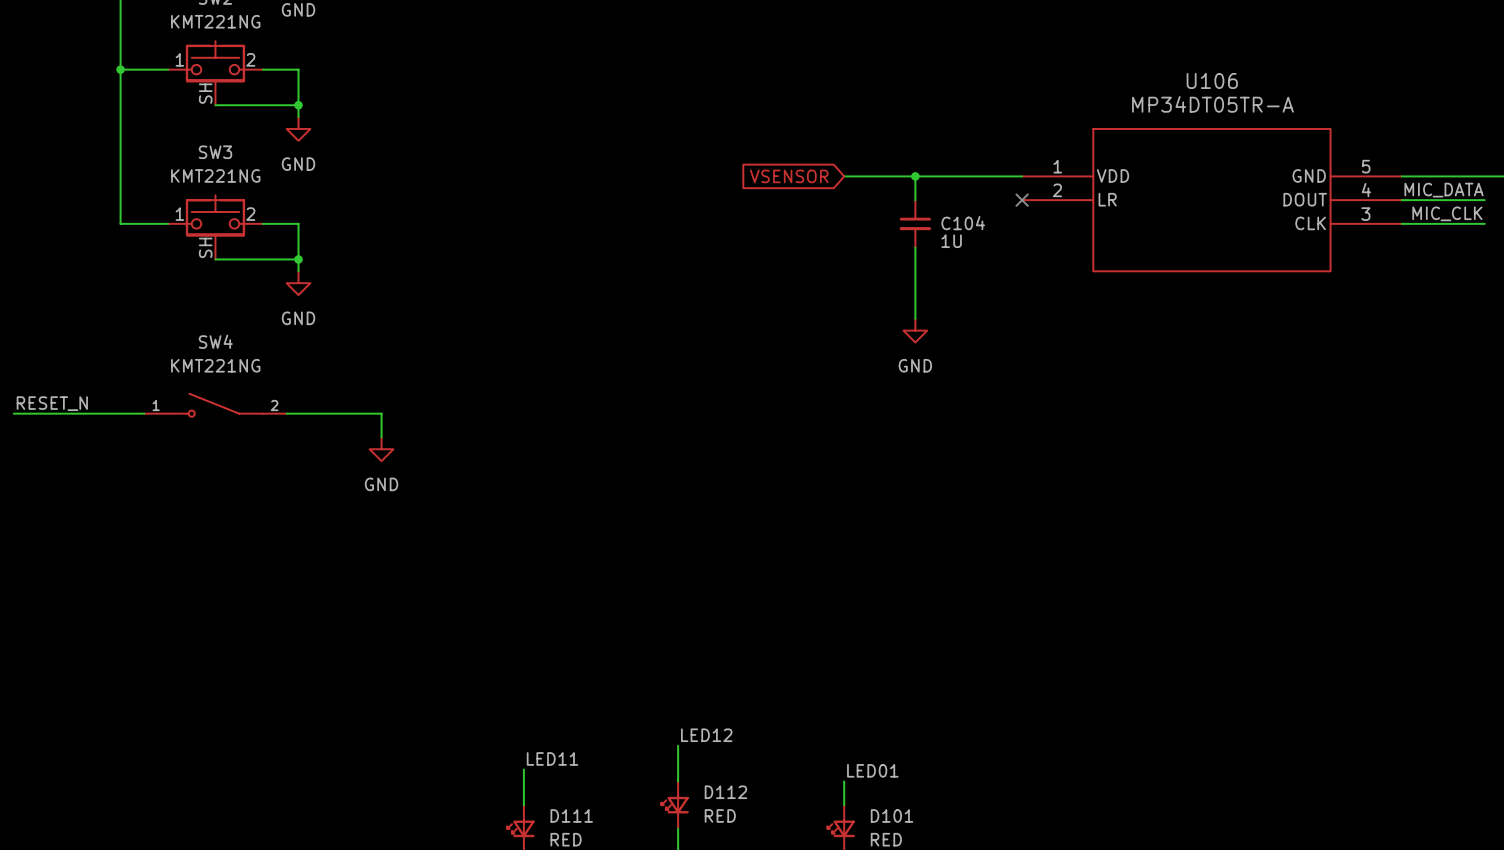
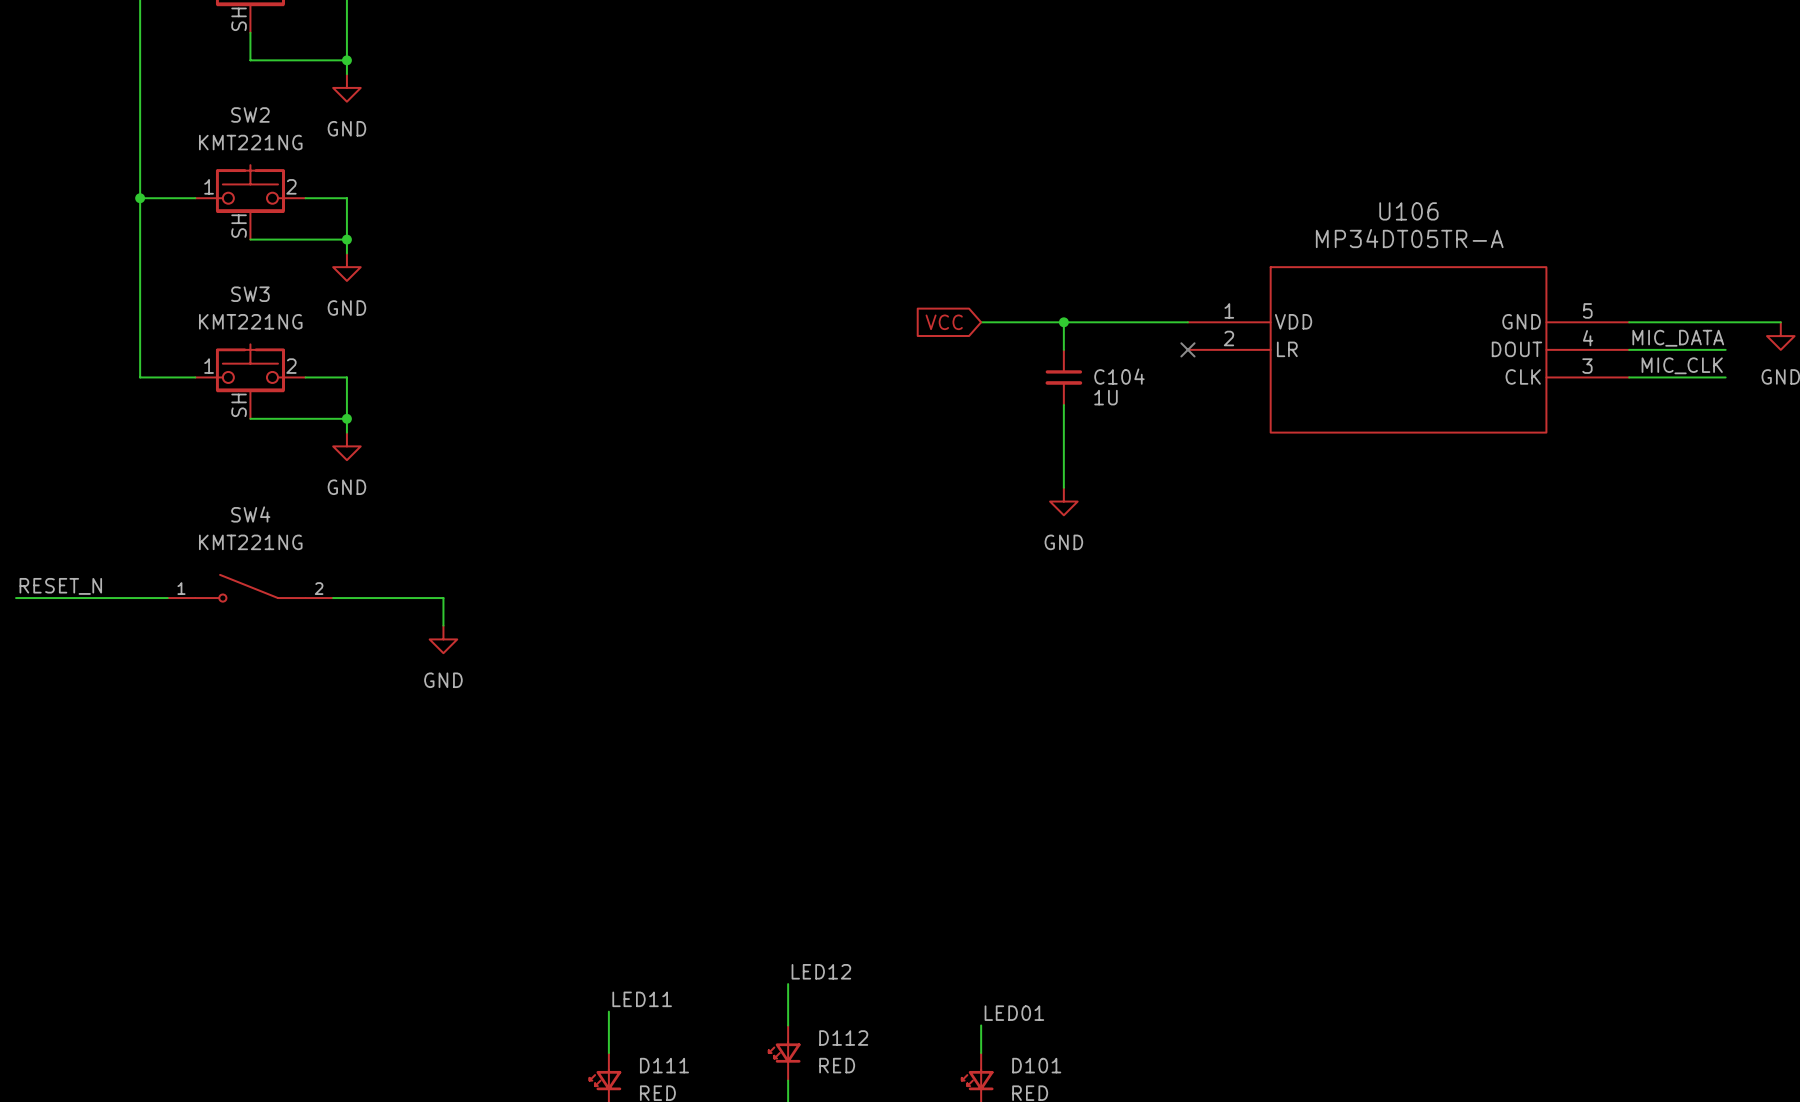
global label: VSENSOR (789, 176) -> VCC (944, 322)

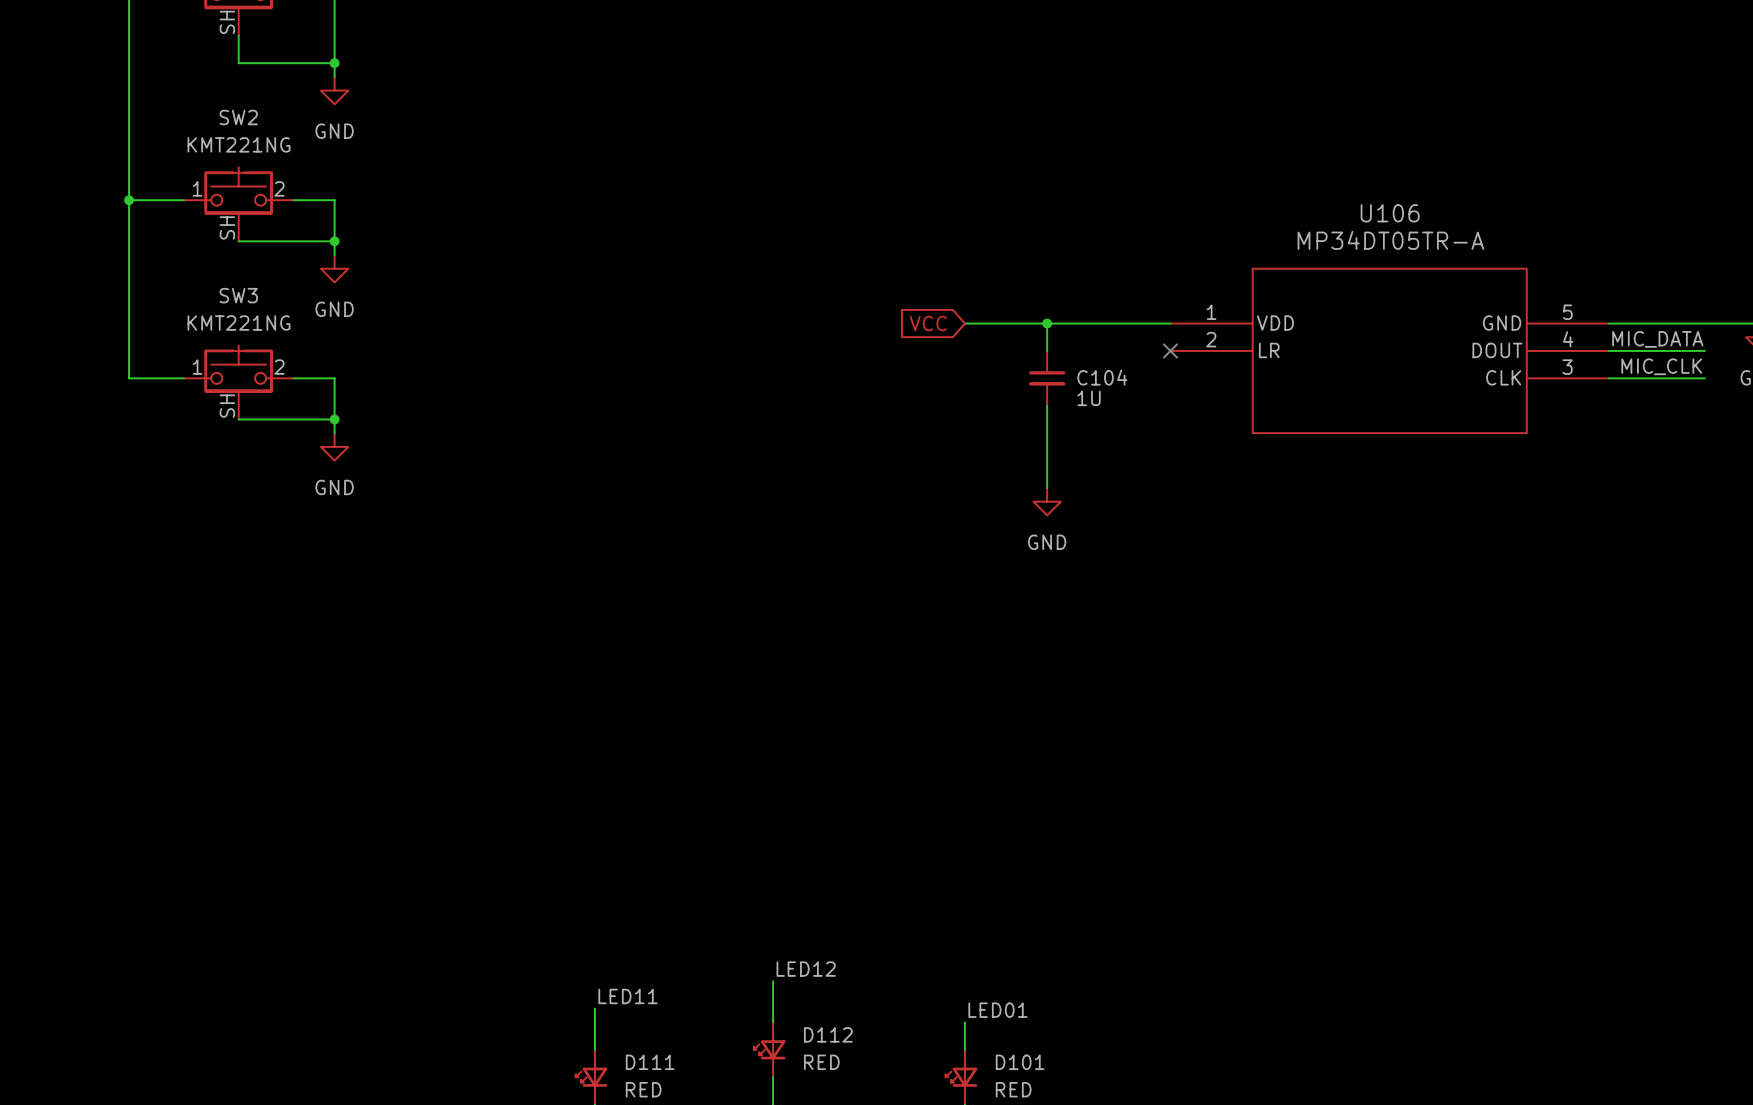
label: RESET_N (60, 586) -> none
SW4: KMT221NG (250, 588) -> none
wire: (16, 598) (167, 598) -> none
wire: (333, 598) (443, 598) (443, 625) -> none
power symbol: GND (443, 639) -> none

